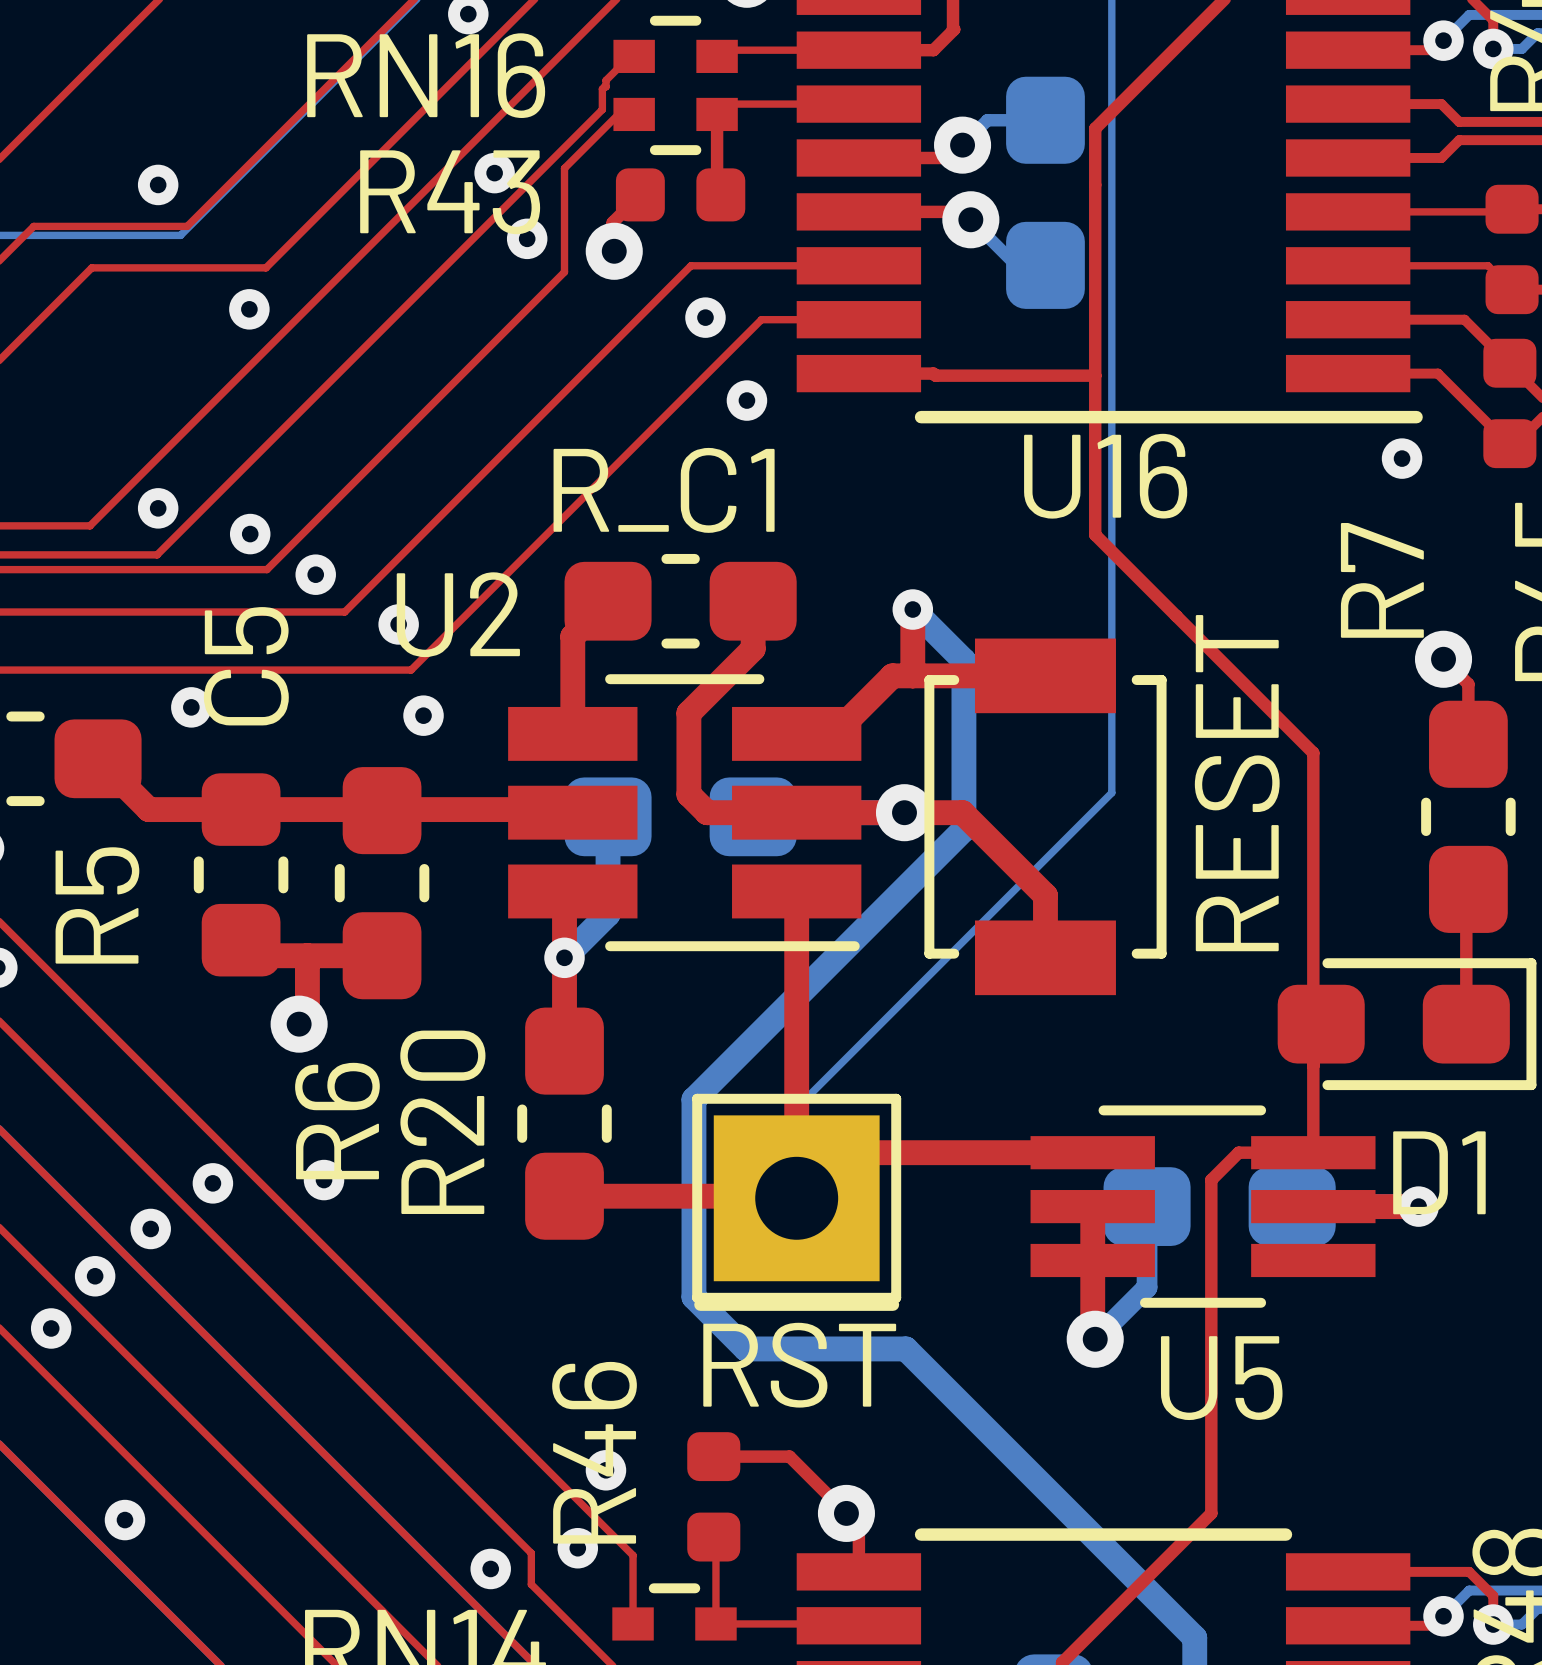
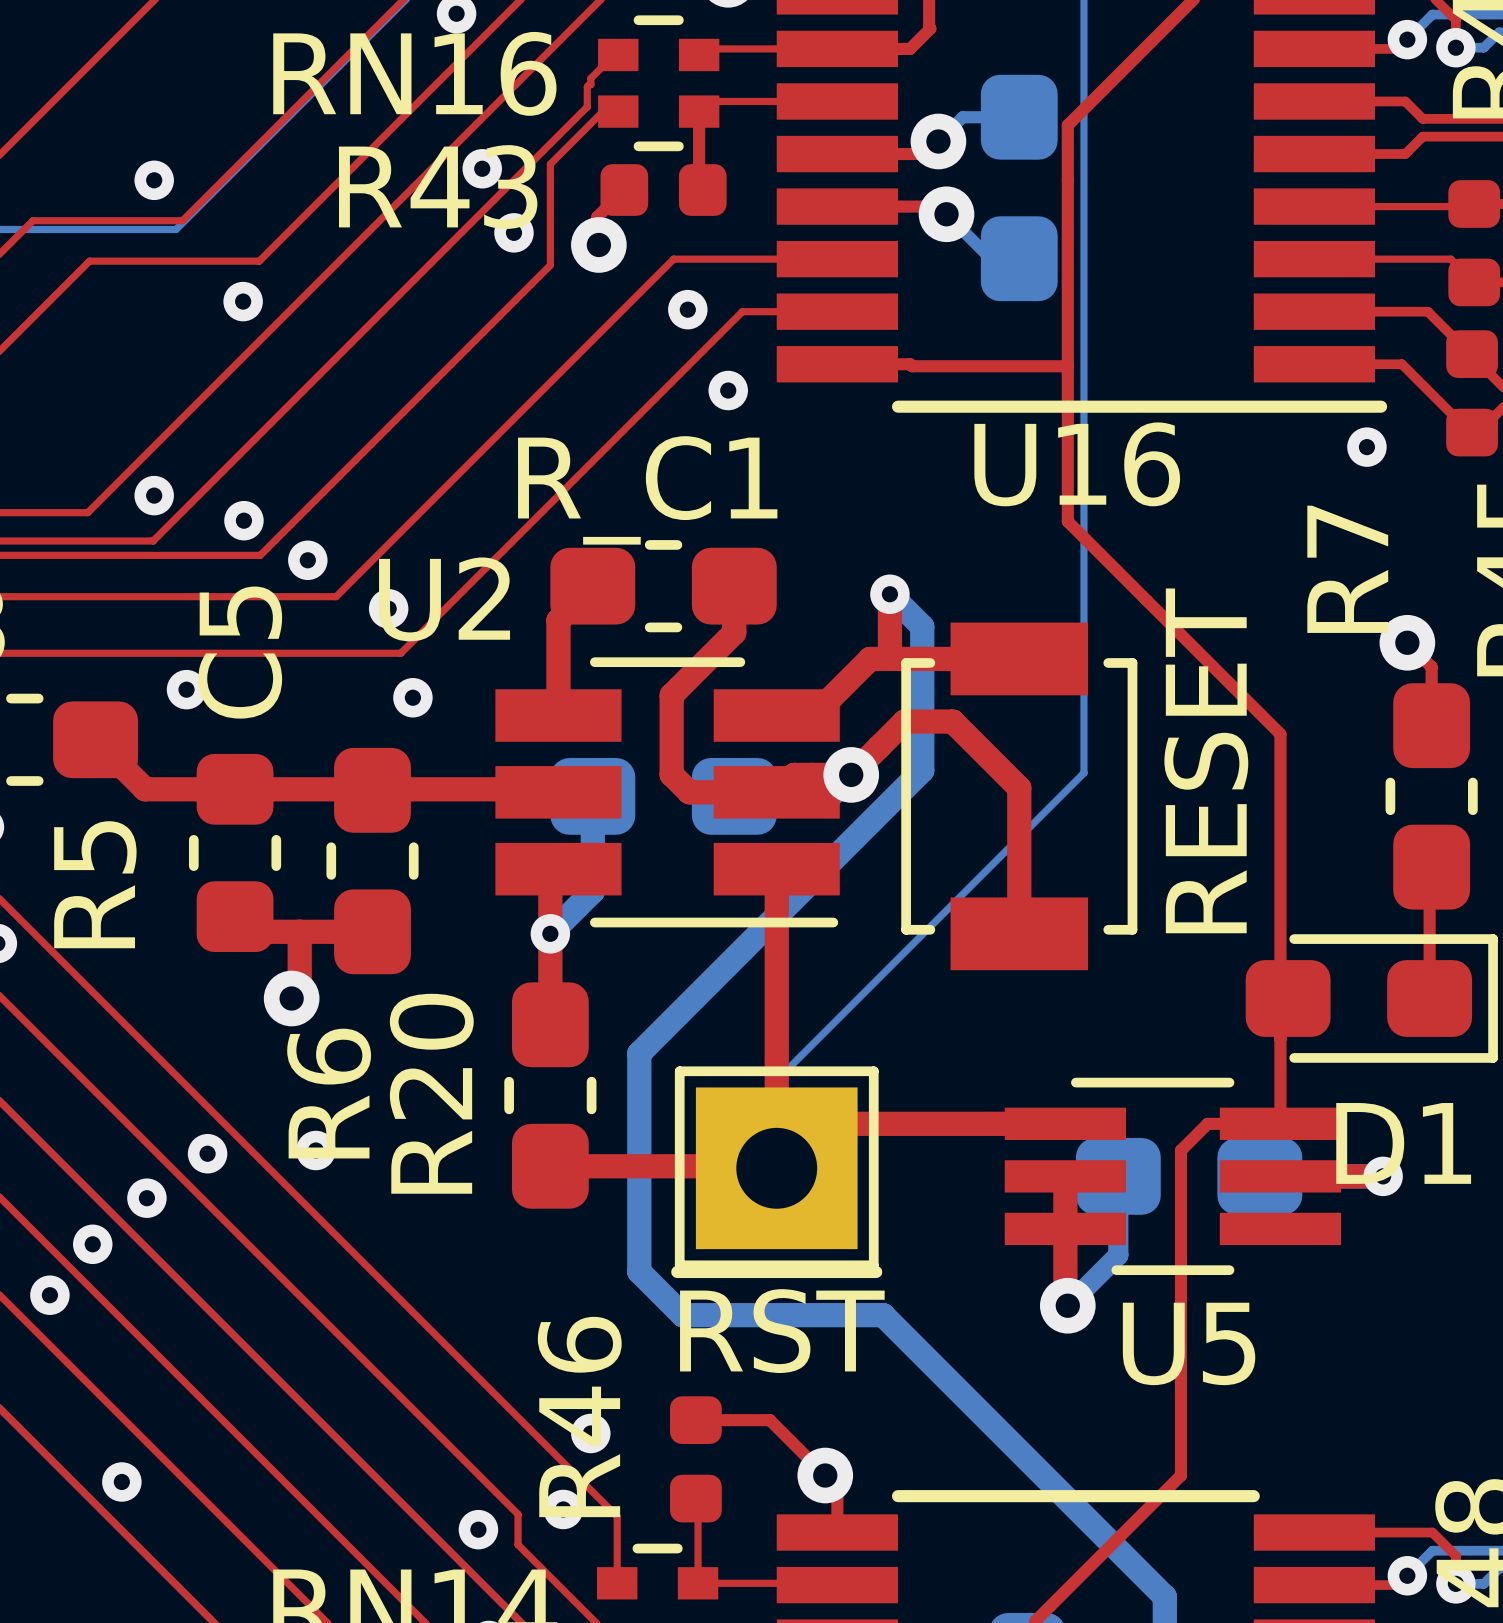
bottom track: (945, 642) (963, 660) (963, 829) (693, 1099) (693, 1297) (745, 1348) -> (922, 626) (922, 770) (639, 1053) (639, 1271) (682, 1315) (727, 1315)
top track: (796, 812) (962, 812) (1045, 895) -> (776, 792) (794, 774) (851, 774) (904, 721) (952, 721) (1019, 788) (1019, 873)
via position: (904, 812) -> (851, 774)

